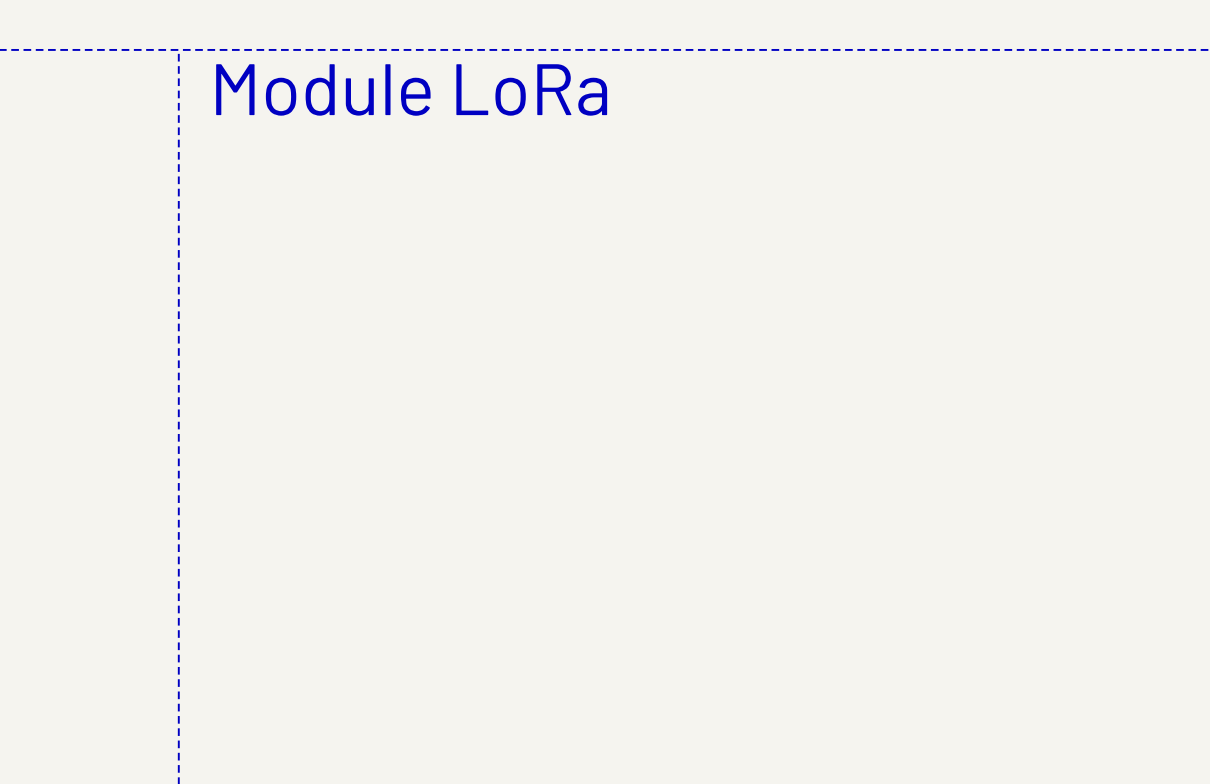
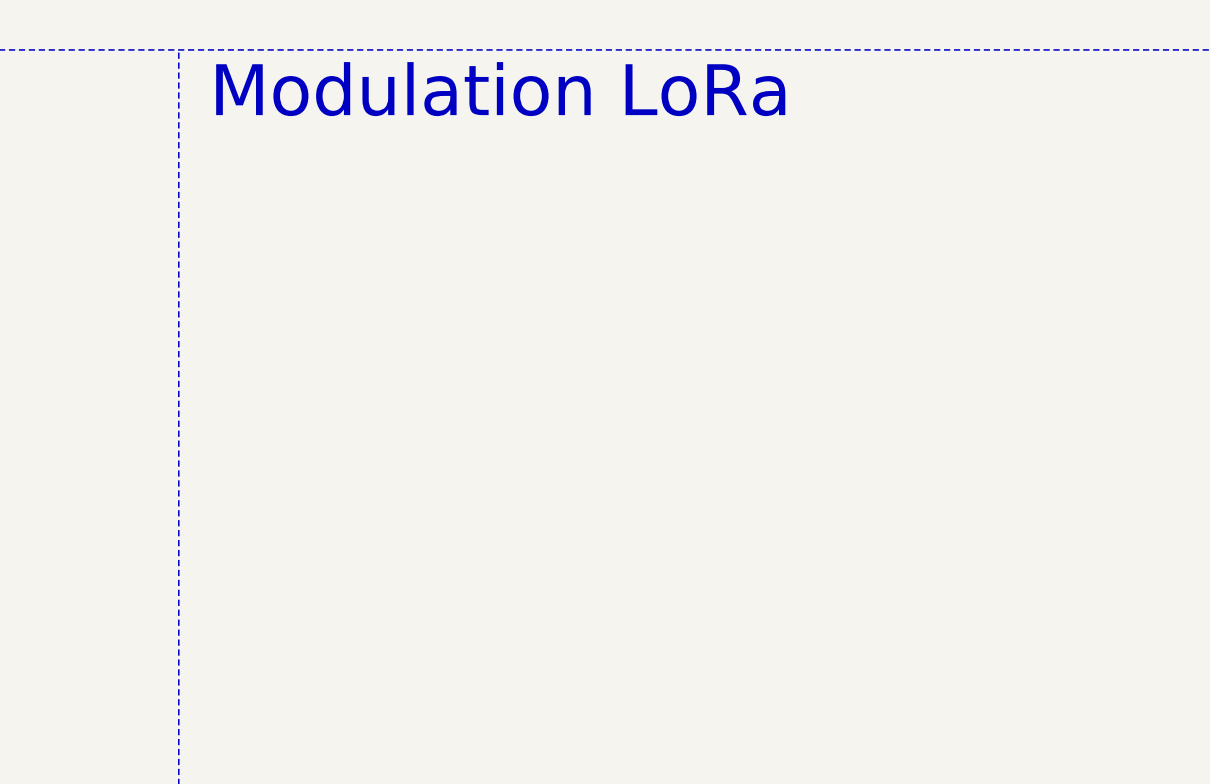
text: Module LoRa (411, 89) -> Modulation LoRa (500, 89)

